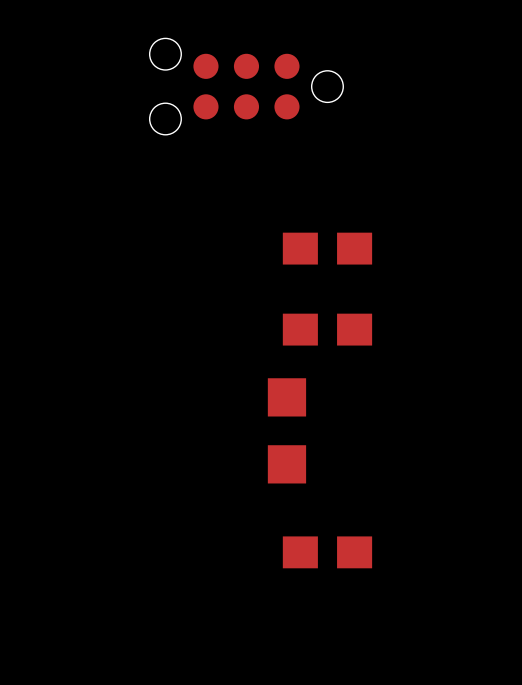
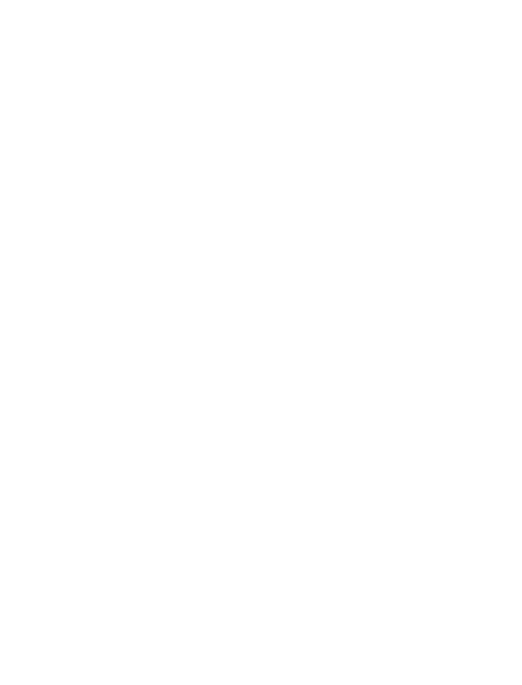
part: (246, 86) -> none
part: (327, 248) -> none
part: (327, 329) -> none
part: (286, 430) -> none
part: (327, 552) -> none

